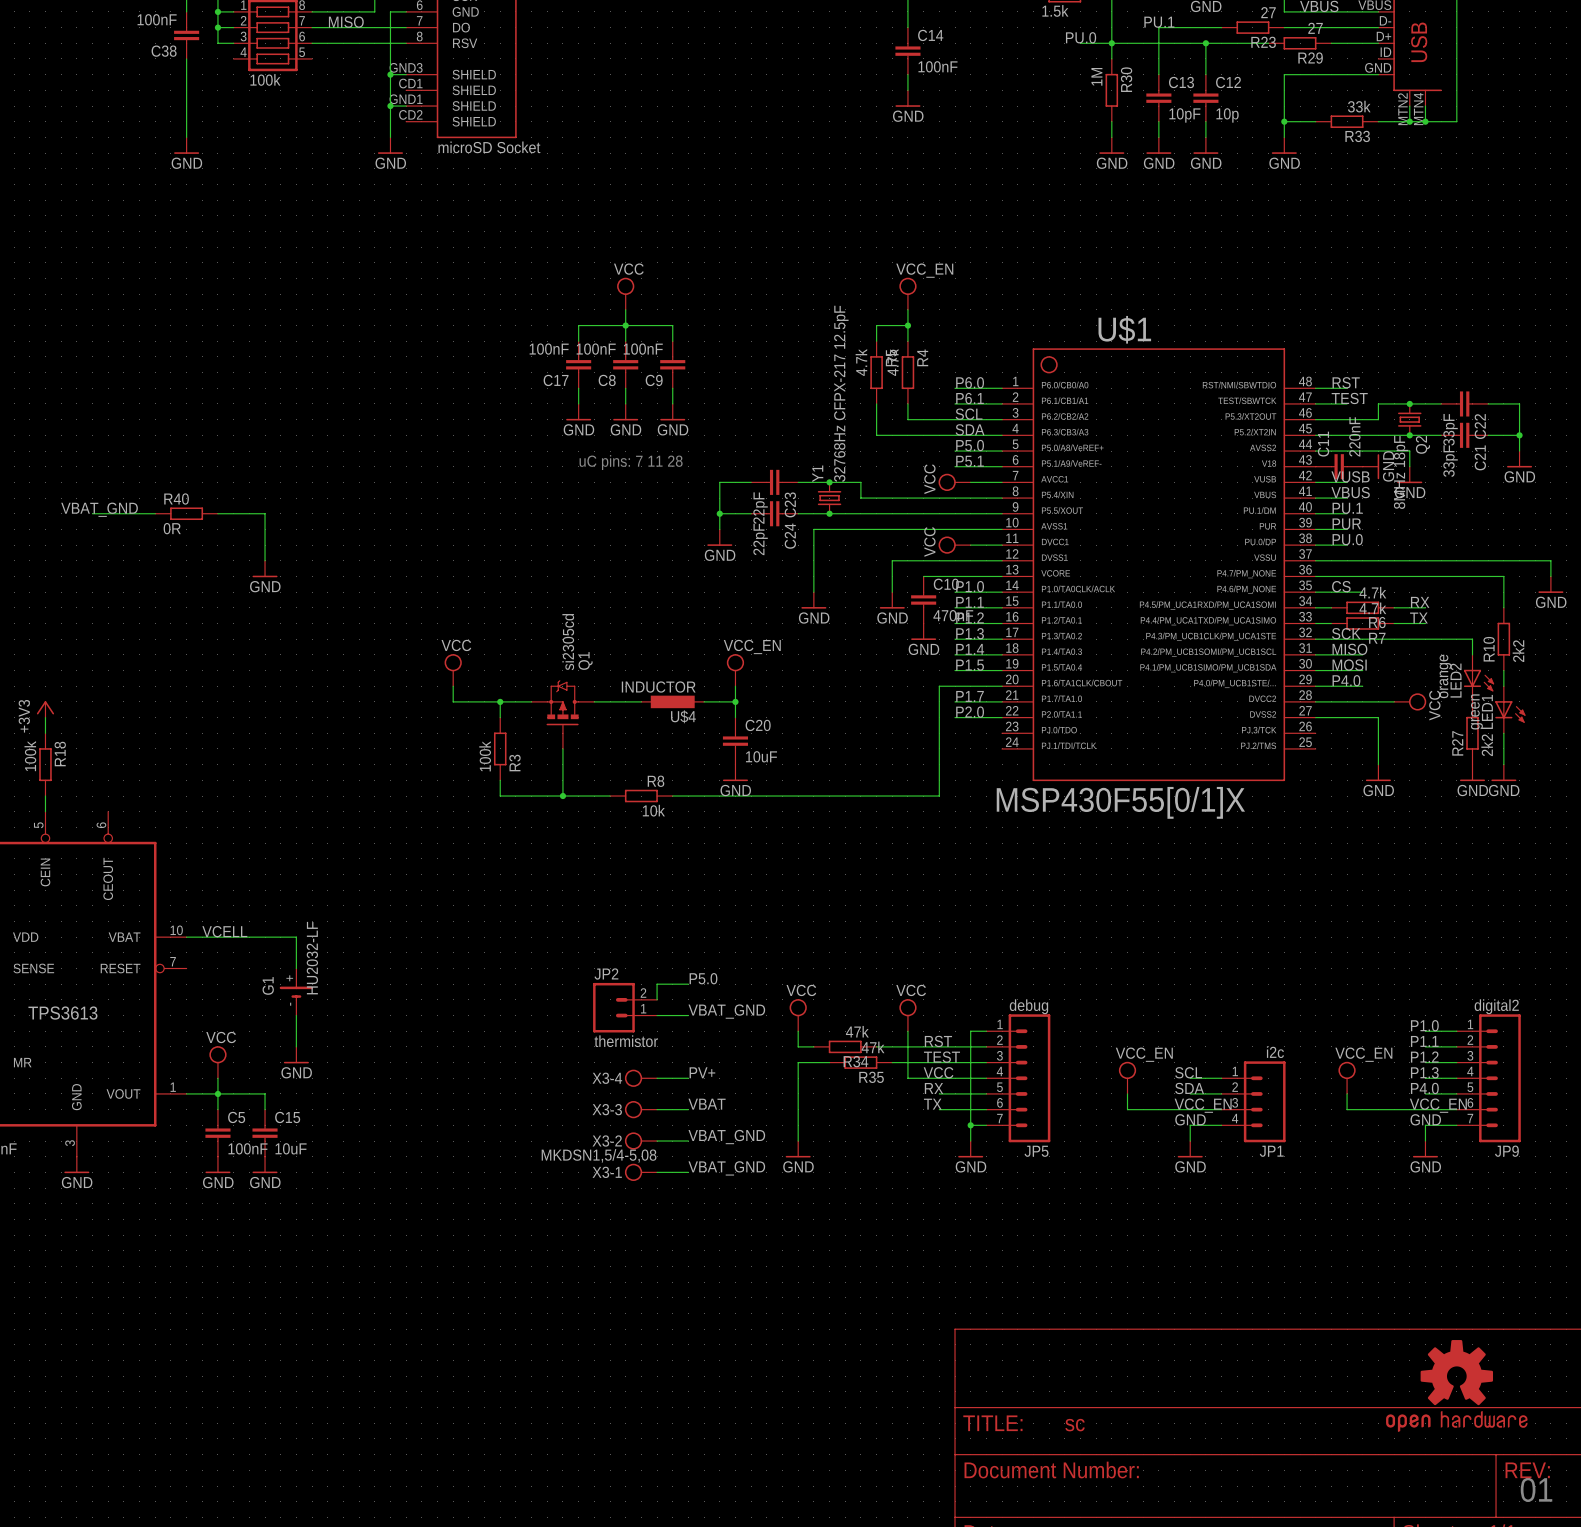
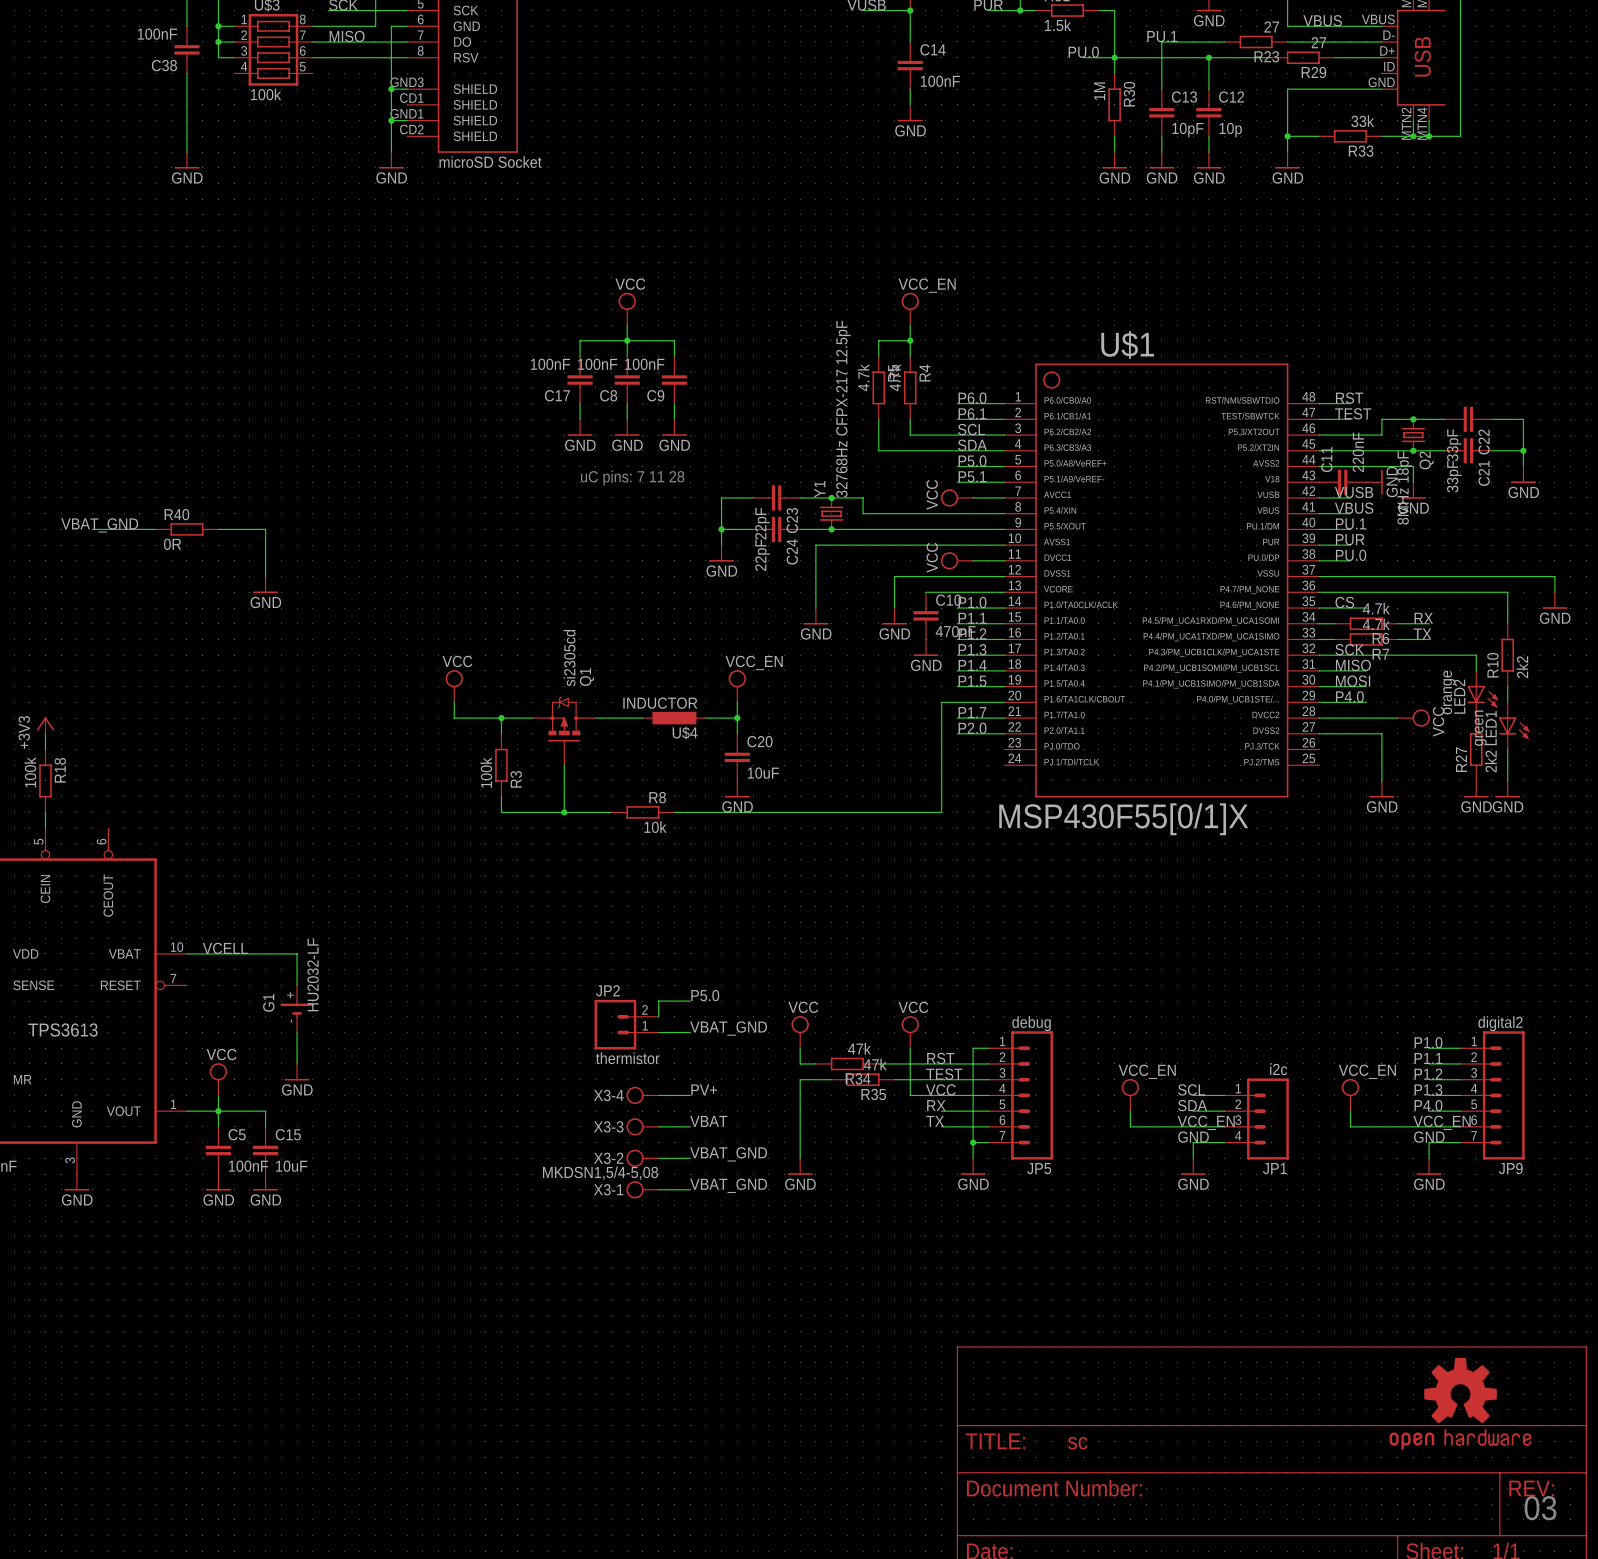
text: 01 (1536, 1489) -> 03 (1540, 1508)

